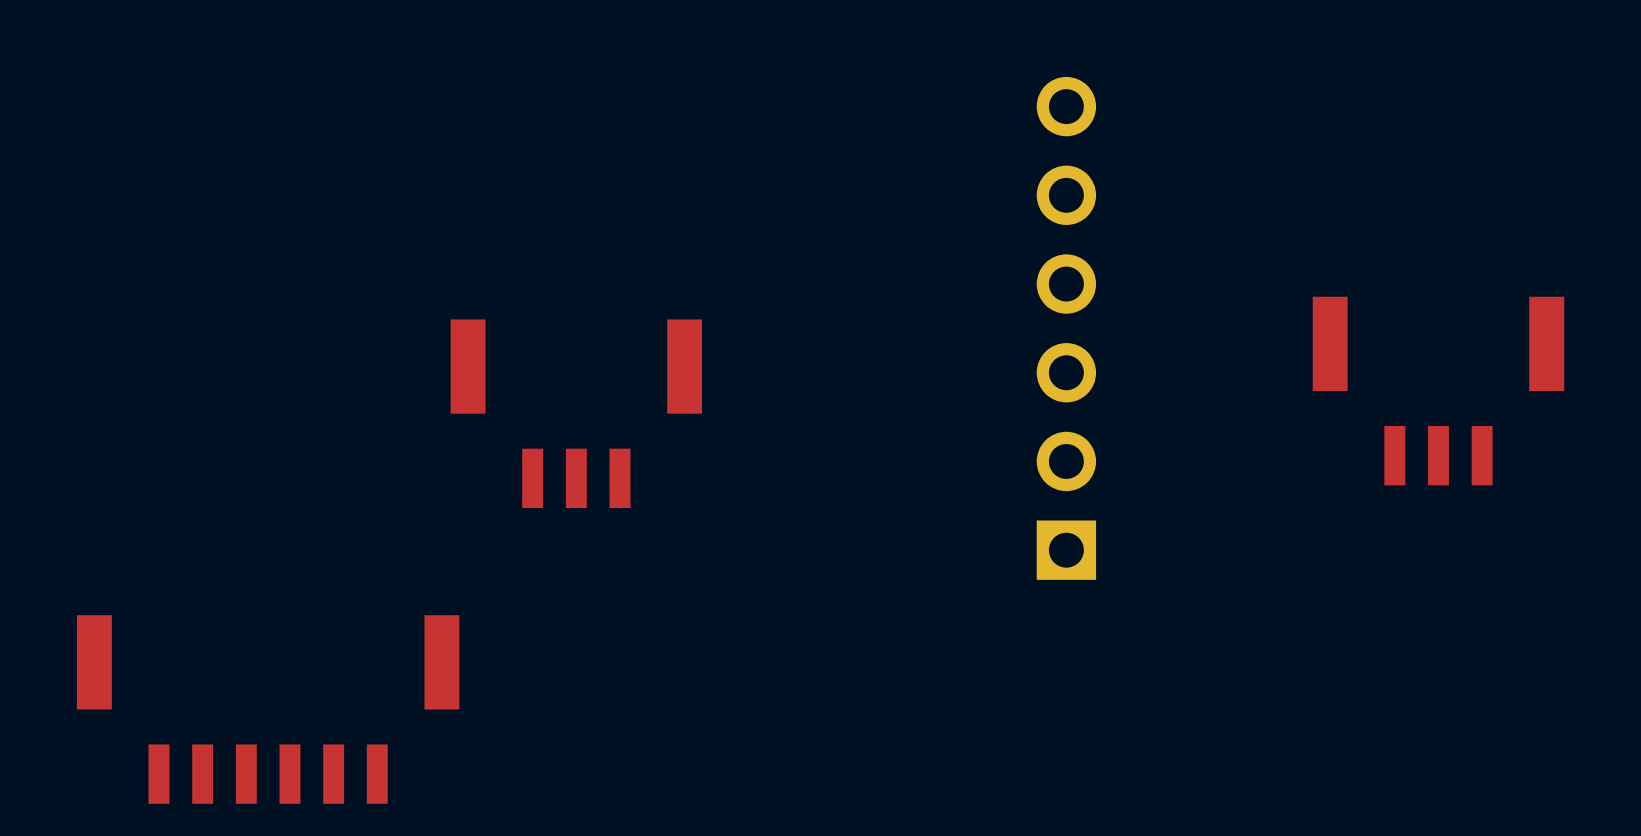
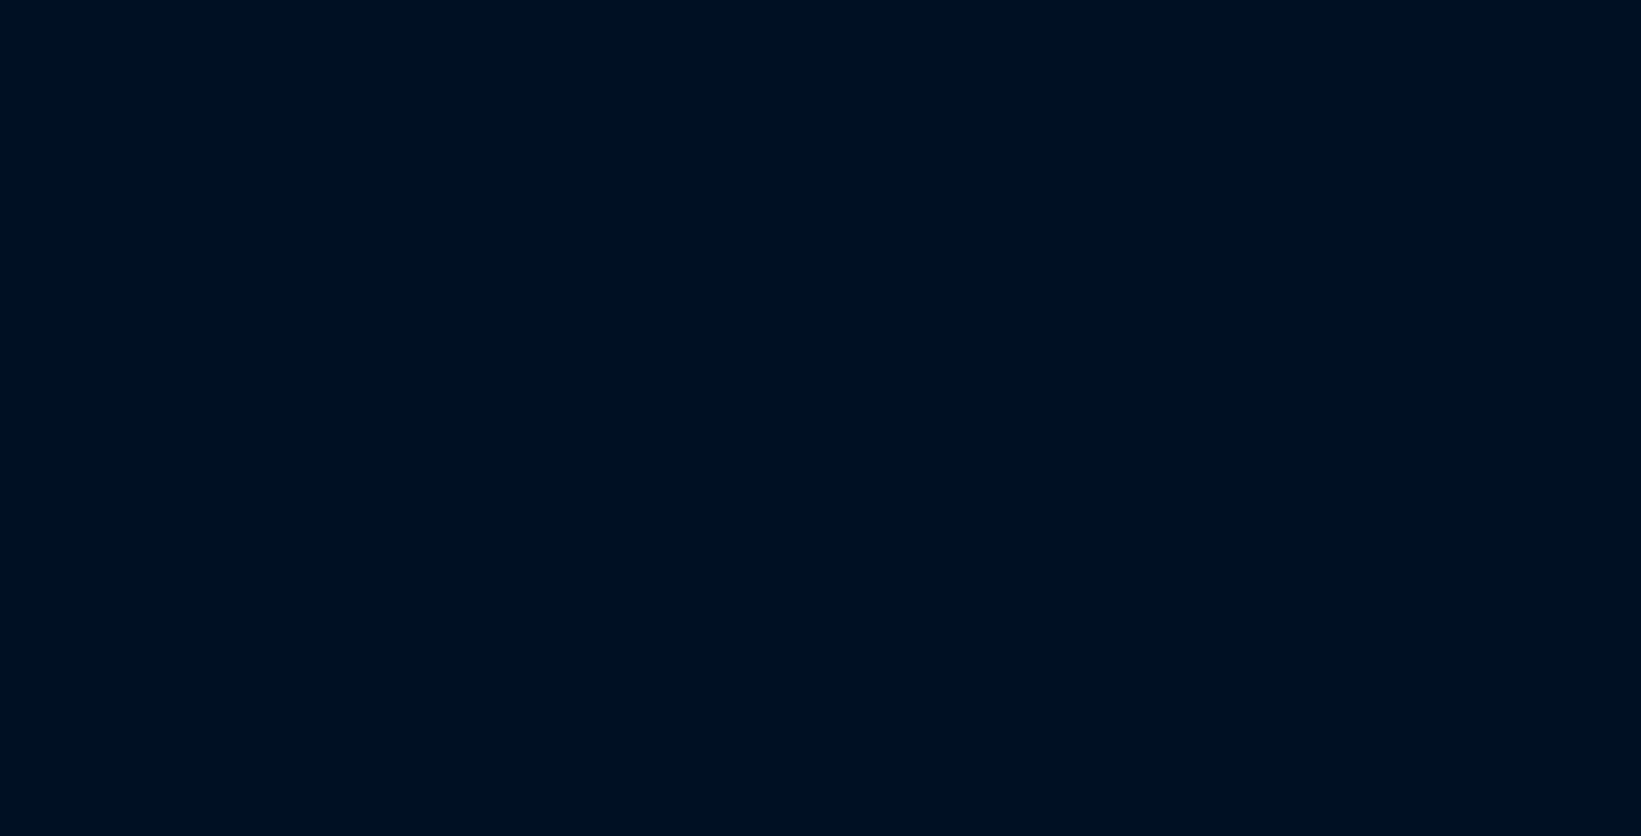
part: (1066, 328) -> none
part: (1438, 391) -> none
part: (576, 413) -> none
part: (268, 709) -> none

